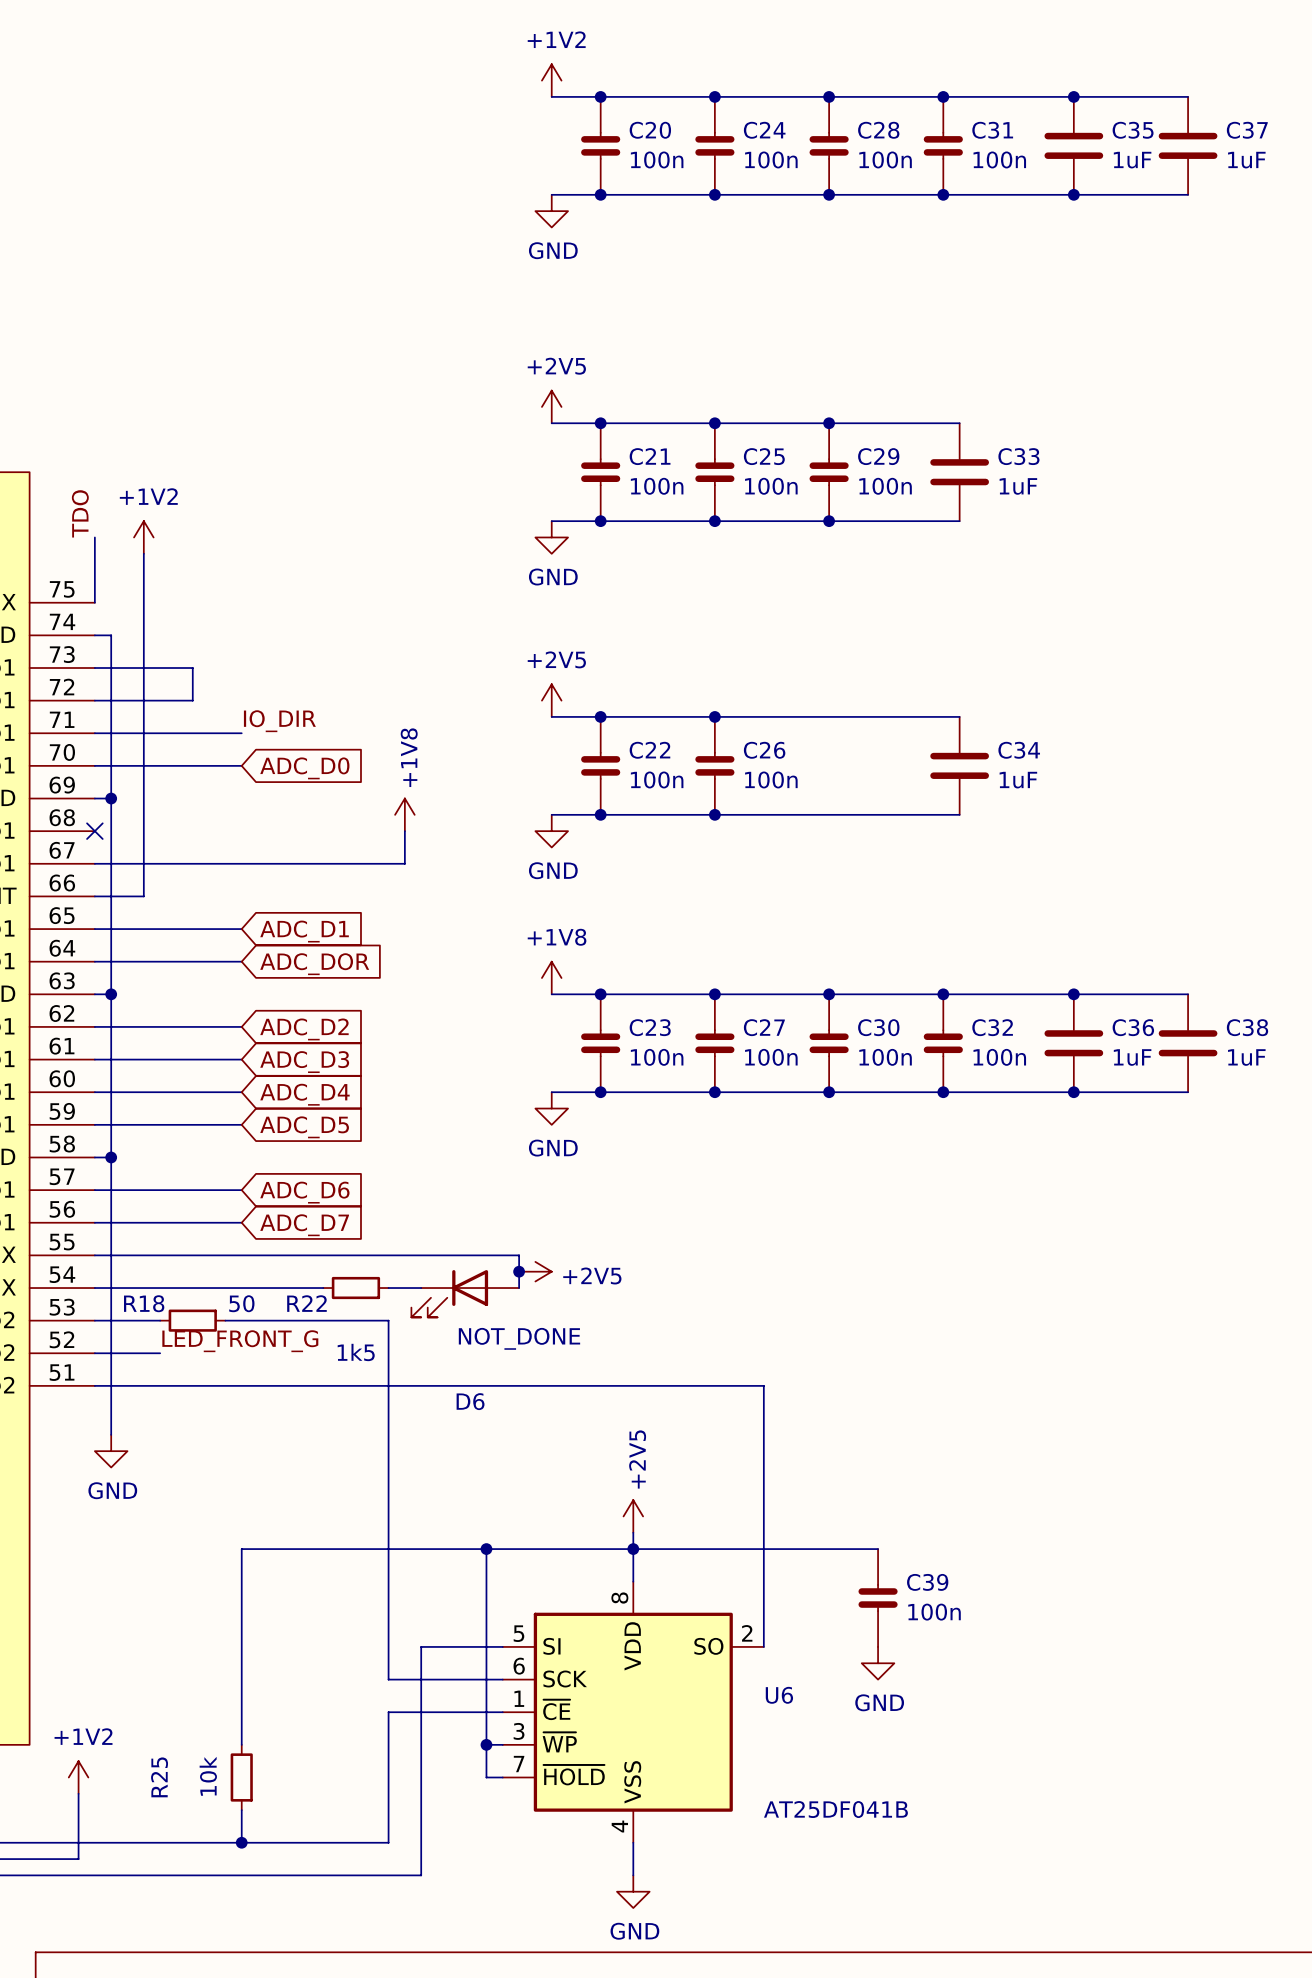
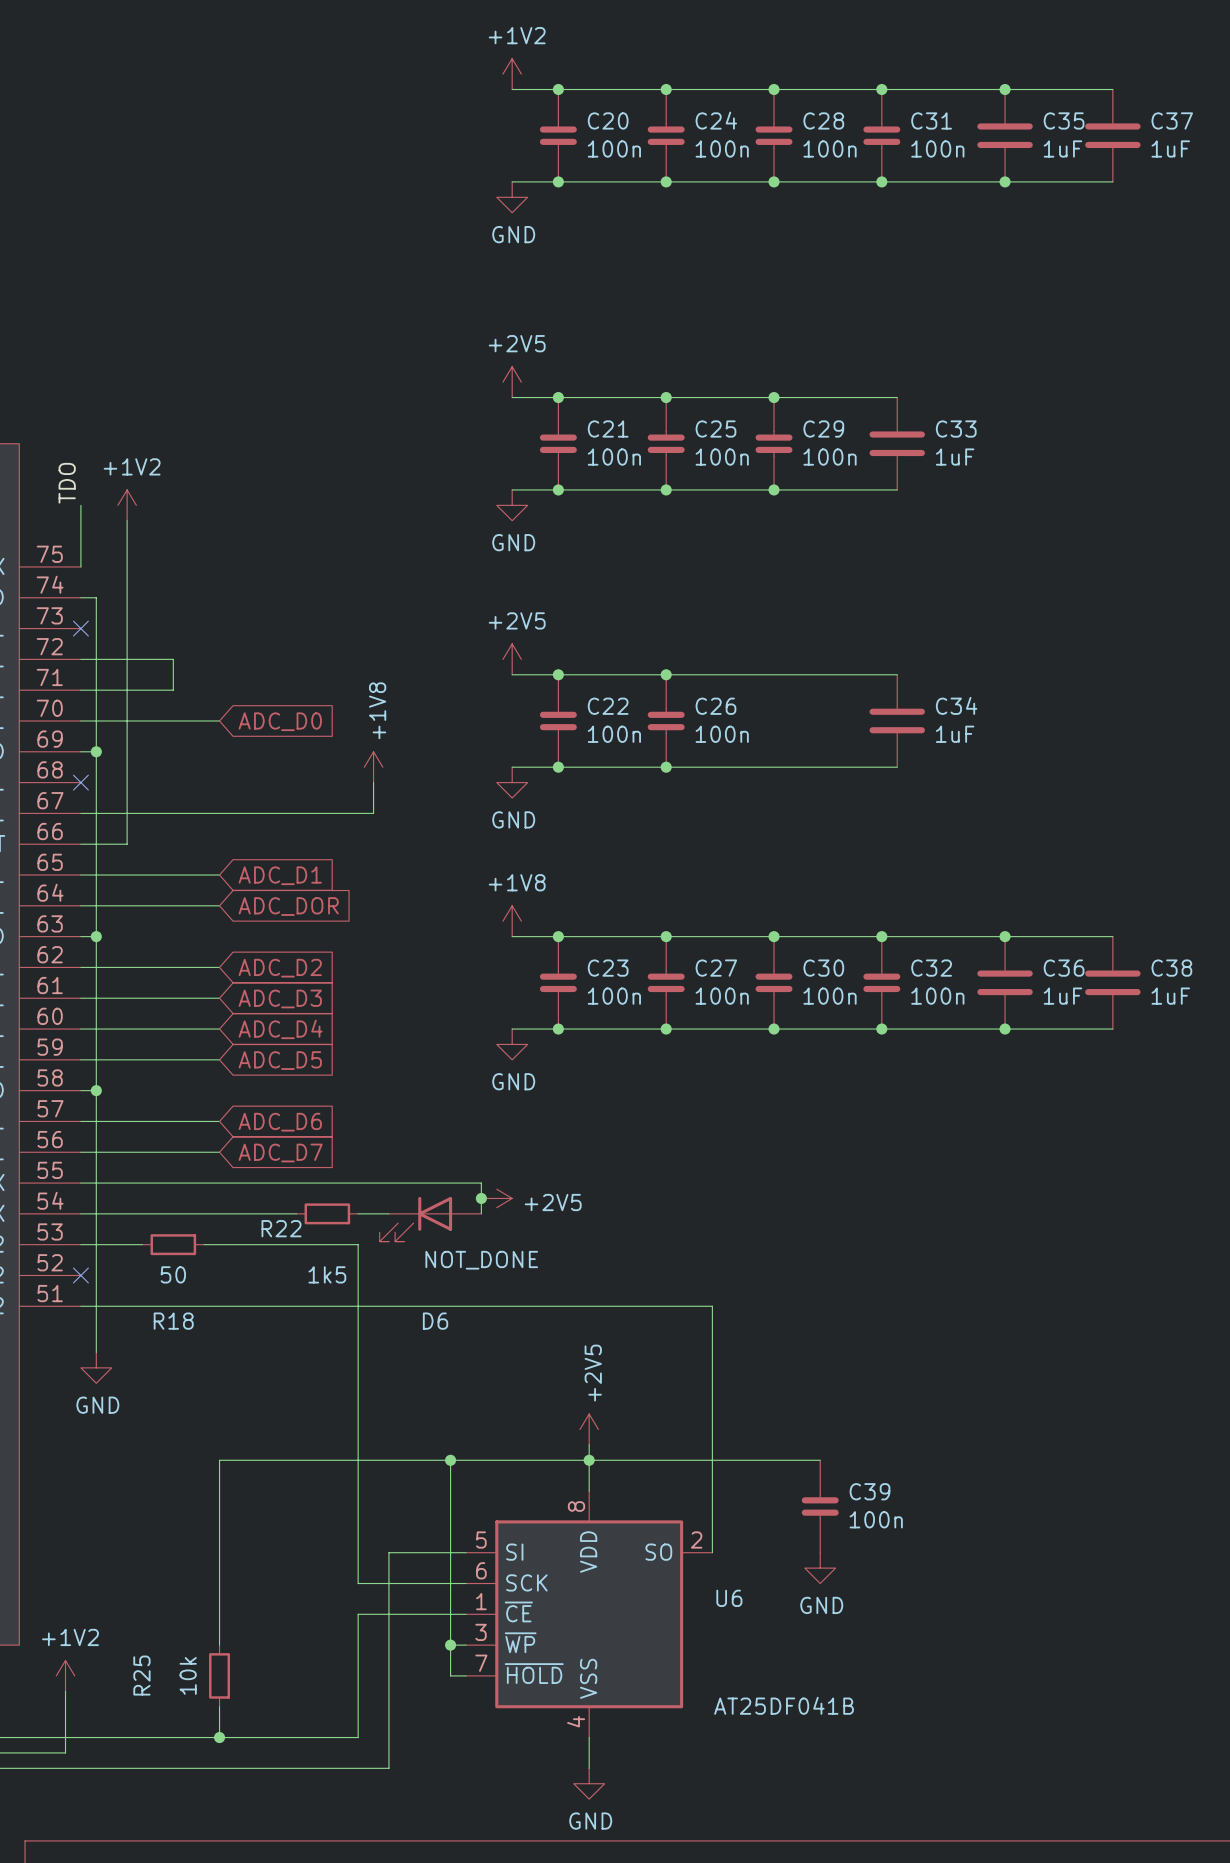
wire: (94, 668) (192, 668) (192, 700) -> none
no-connect mark: none -> (80, 628)
label: IO_DIR (279, 721) -> none
wire: (192, 733) (241, 733) -> (173, 690) (173, 659)
R18 name position: R18 (144, 1303) -> R18 (173, 1321)
R18 value position: 50 (241, 1303) -> 50 (173, 1274)
label: LED_FRONT_G (240, 1341) -> none
wire: (94, 1353) (160, 1353) -> none
no-connect mark: none -> (80, 1275)

